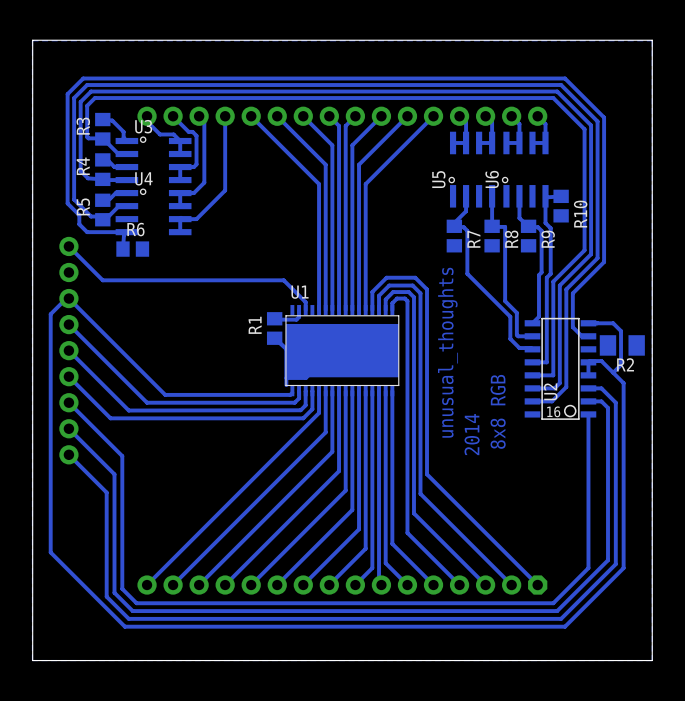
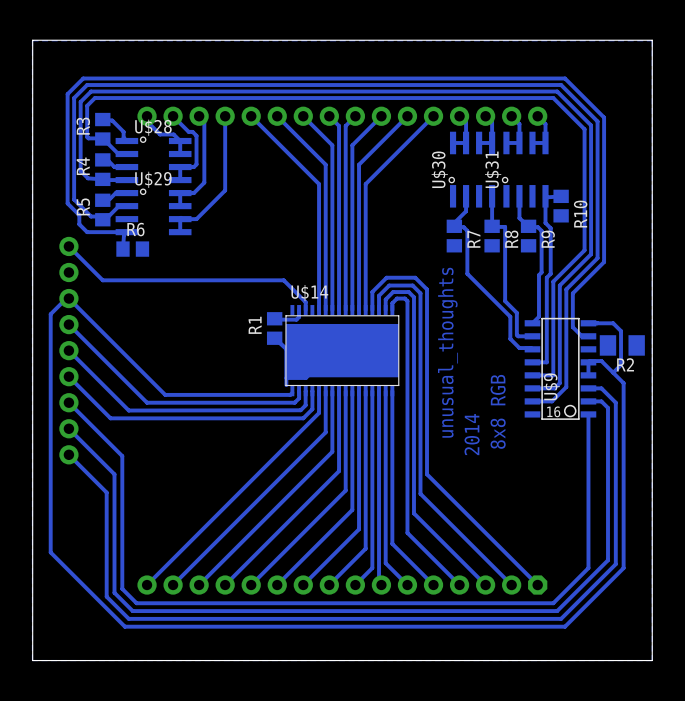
U3 name: U3 (143, 126) -> U$28 (153, 127)
U4 name: U4 (143, 178) -> U$29 (153, 179)
U5 name: U5 (438, 179) -> U$30 (439, 169)
U6 name: U6 (492, 179) -> U$31 (493, 169)
U1 name: U1 (299, 292) -> U$14 (309, 293)
U2 name: U2 (550, 391) -> U$9 (551, 386)

